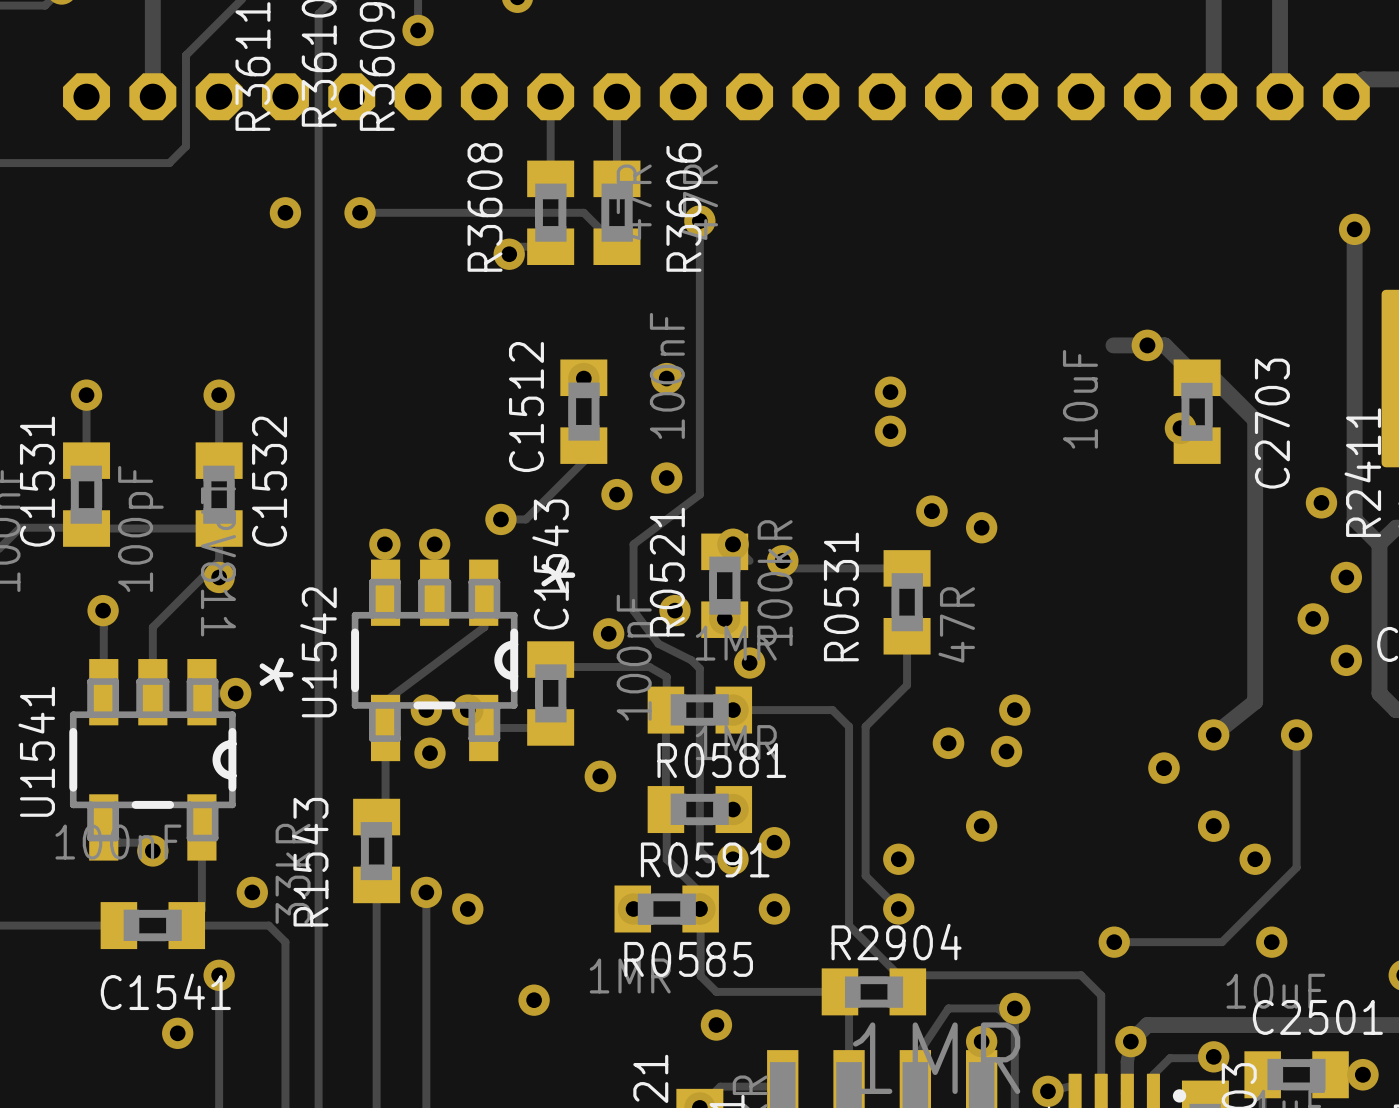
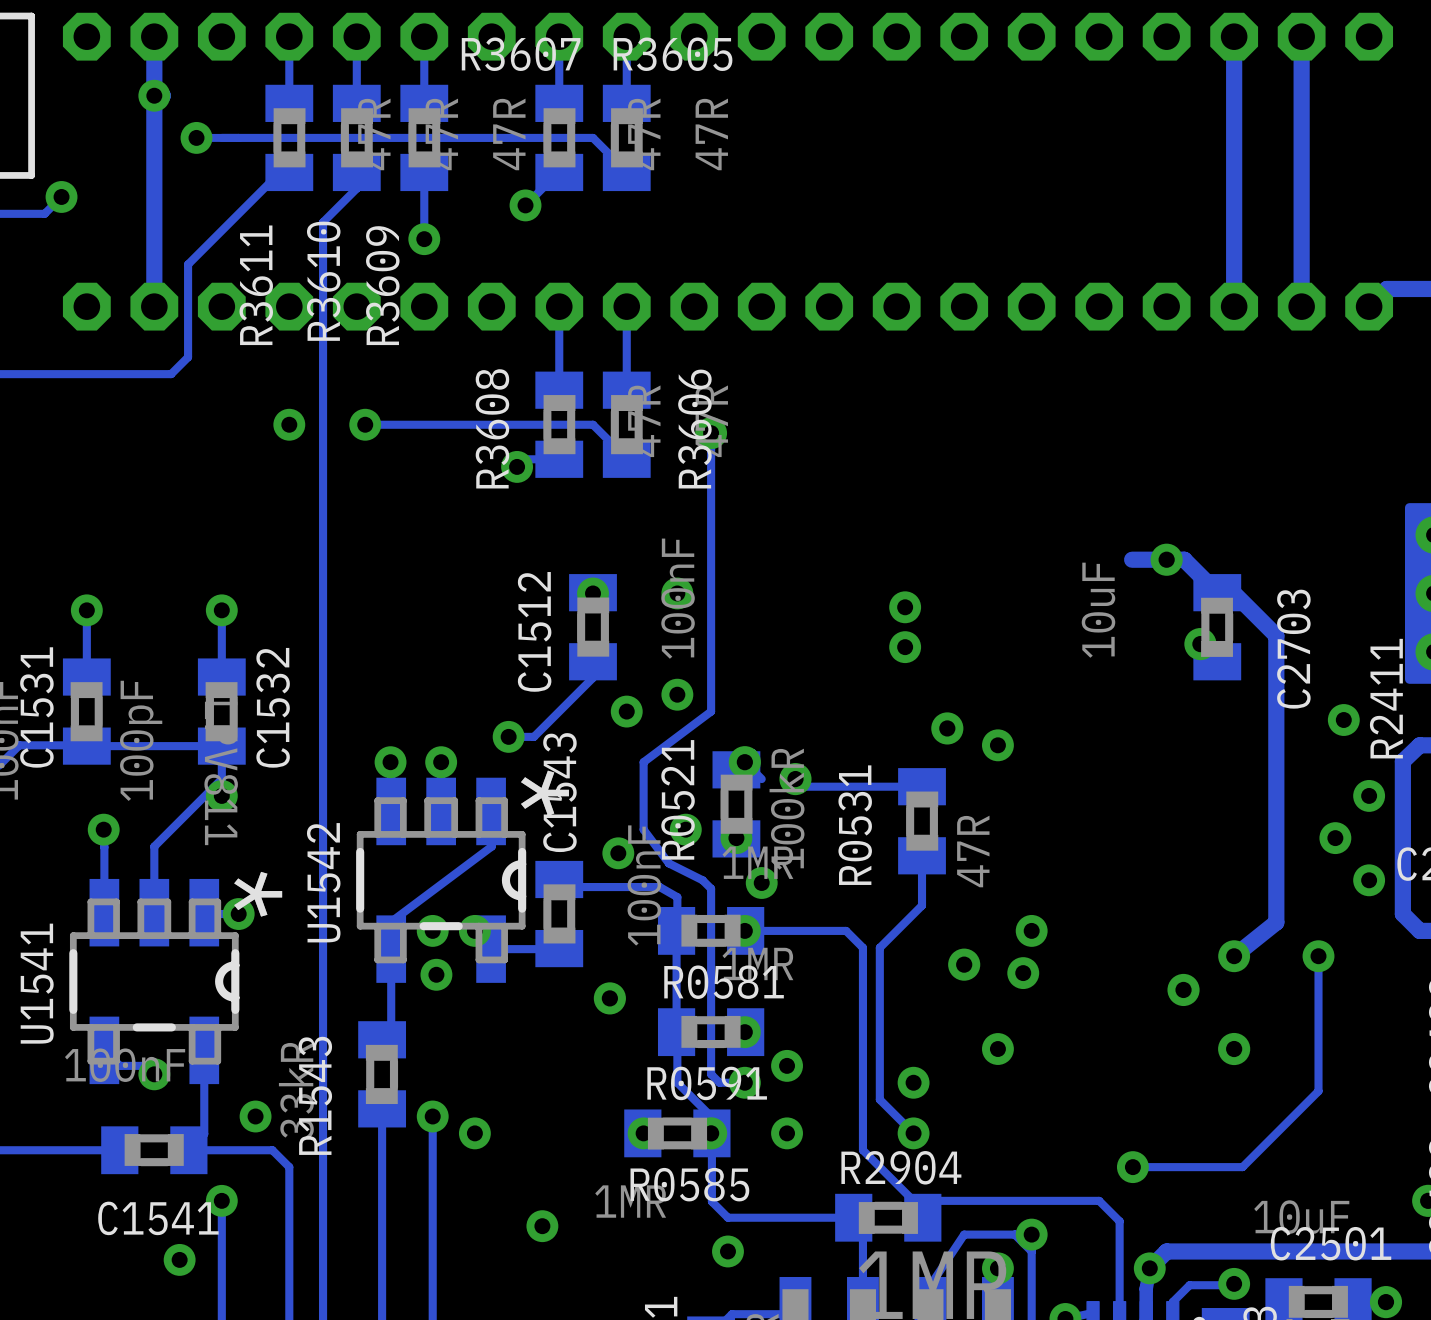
track: (1354, 229) (1354, 519) (1379, 544) -> none
via: (1354, 229) -> none
via: (1255, 859) -> none
via: (1271, 942) -> none

